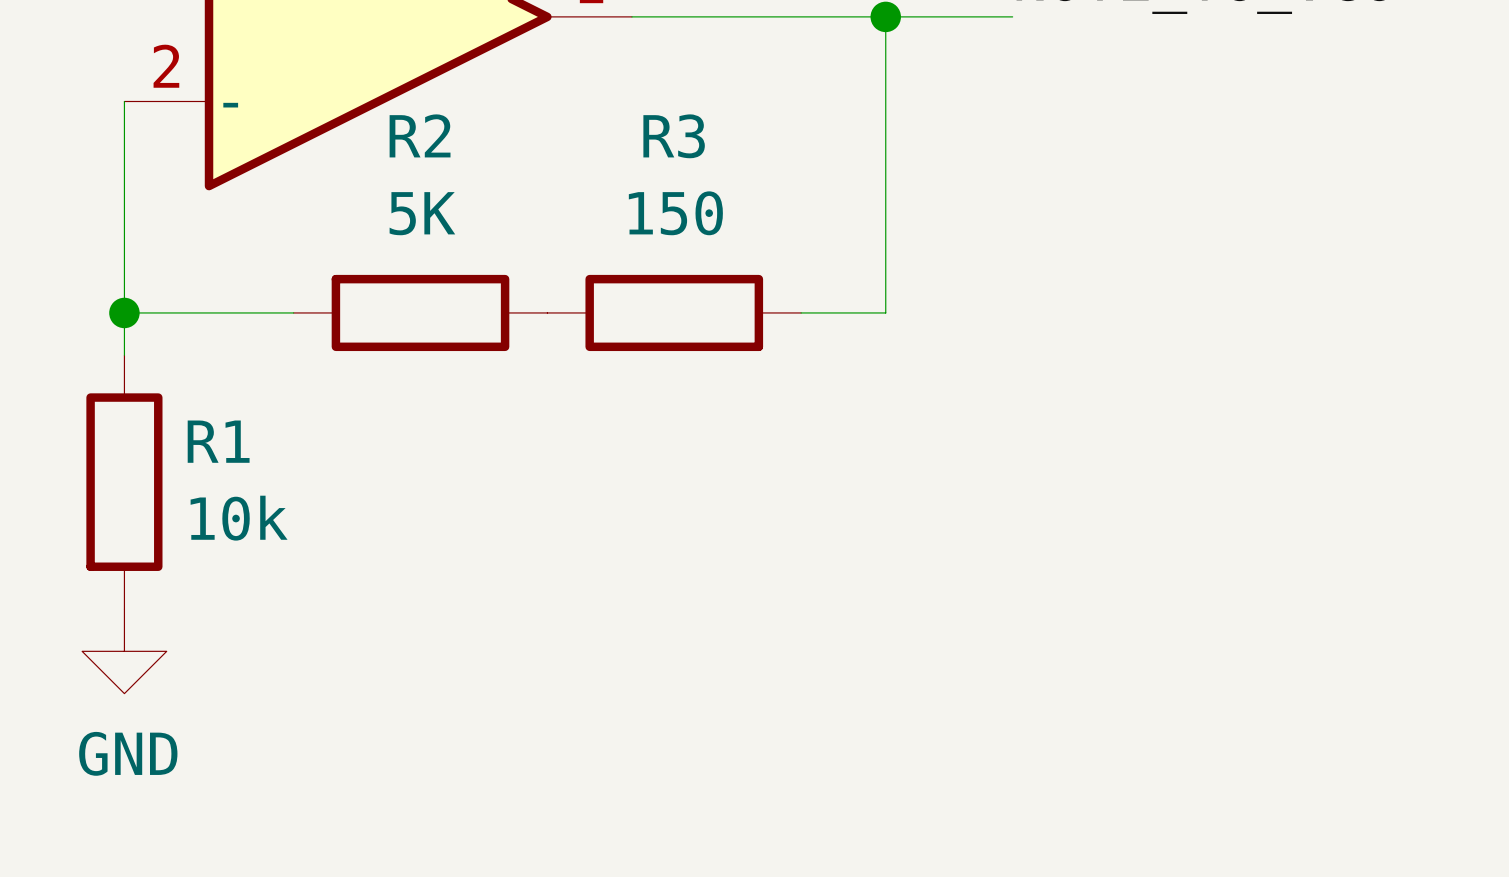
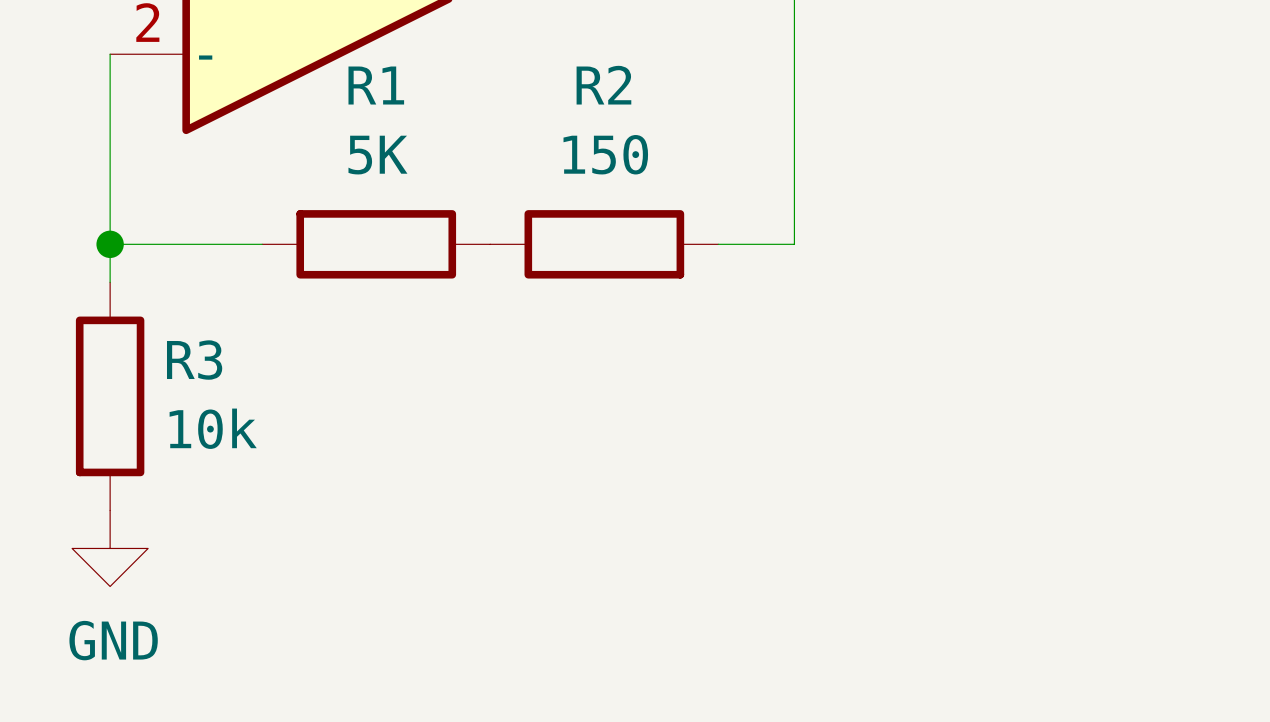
R2 name: R2 (420, 135) -> R1 (376, 85)
R3 name: R3 (674, 136) -> R2 (603, 85)
R1 name: R1 (218, 441) -> R3 (194, 360)

